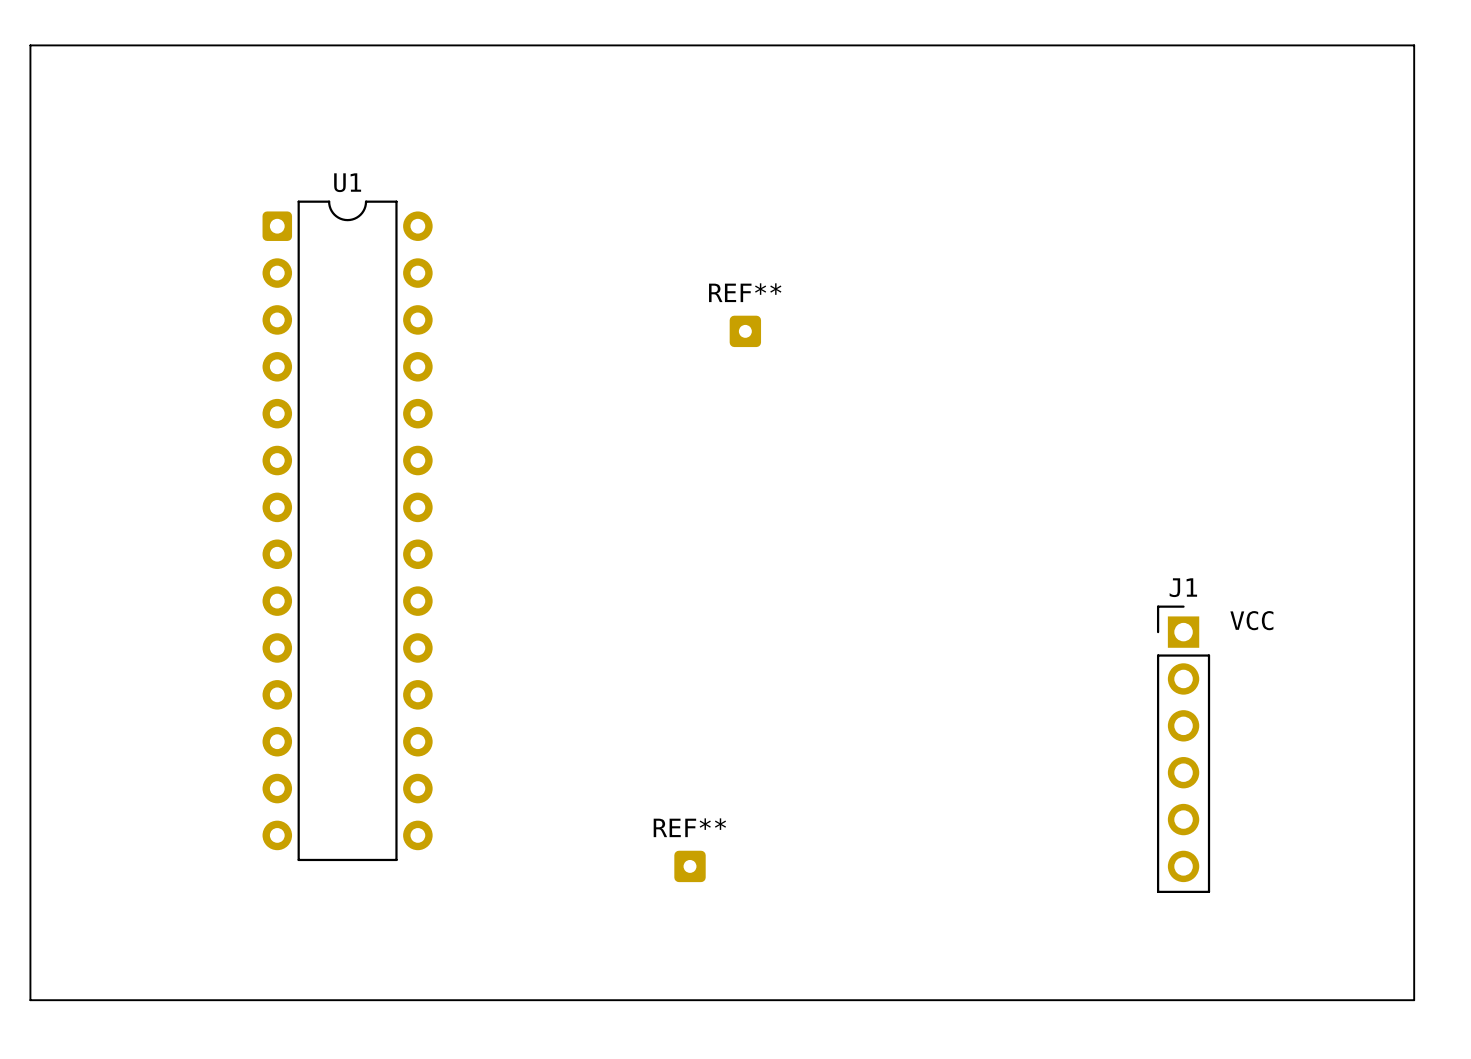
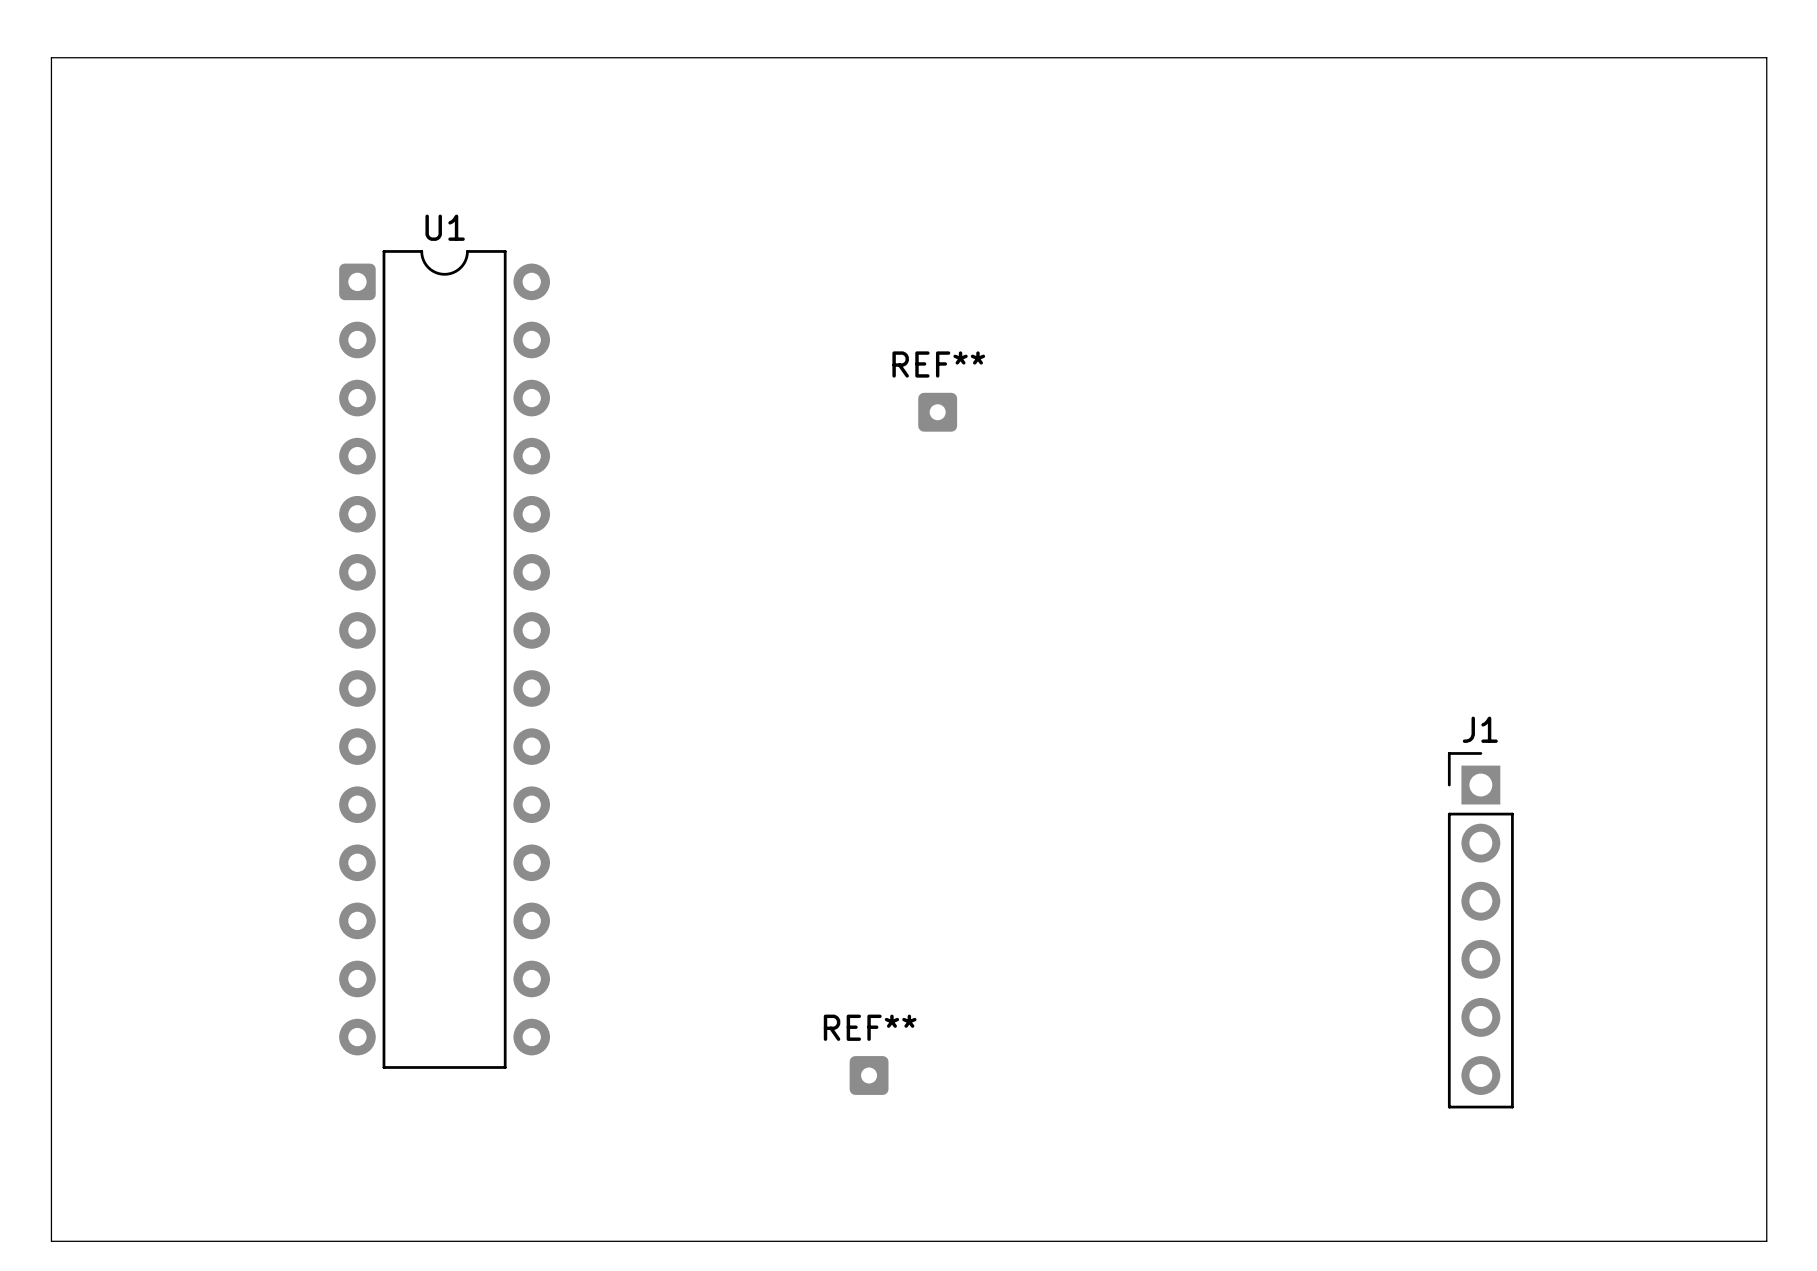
J1 text: VCC (1251, 620) -> none

